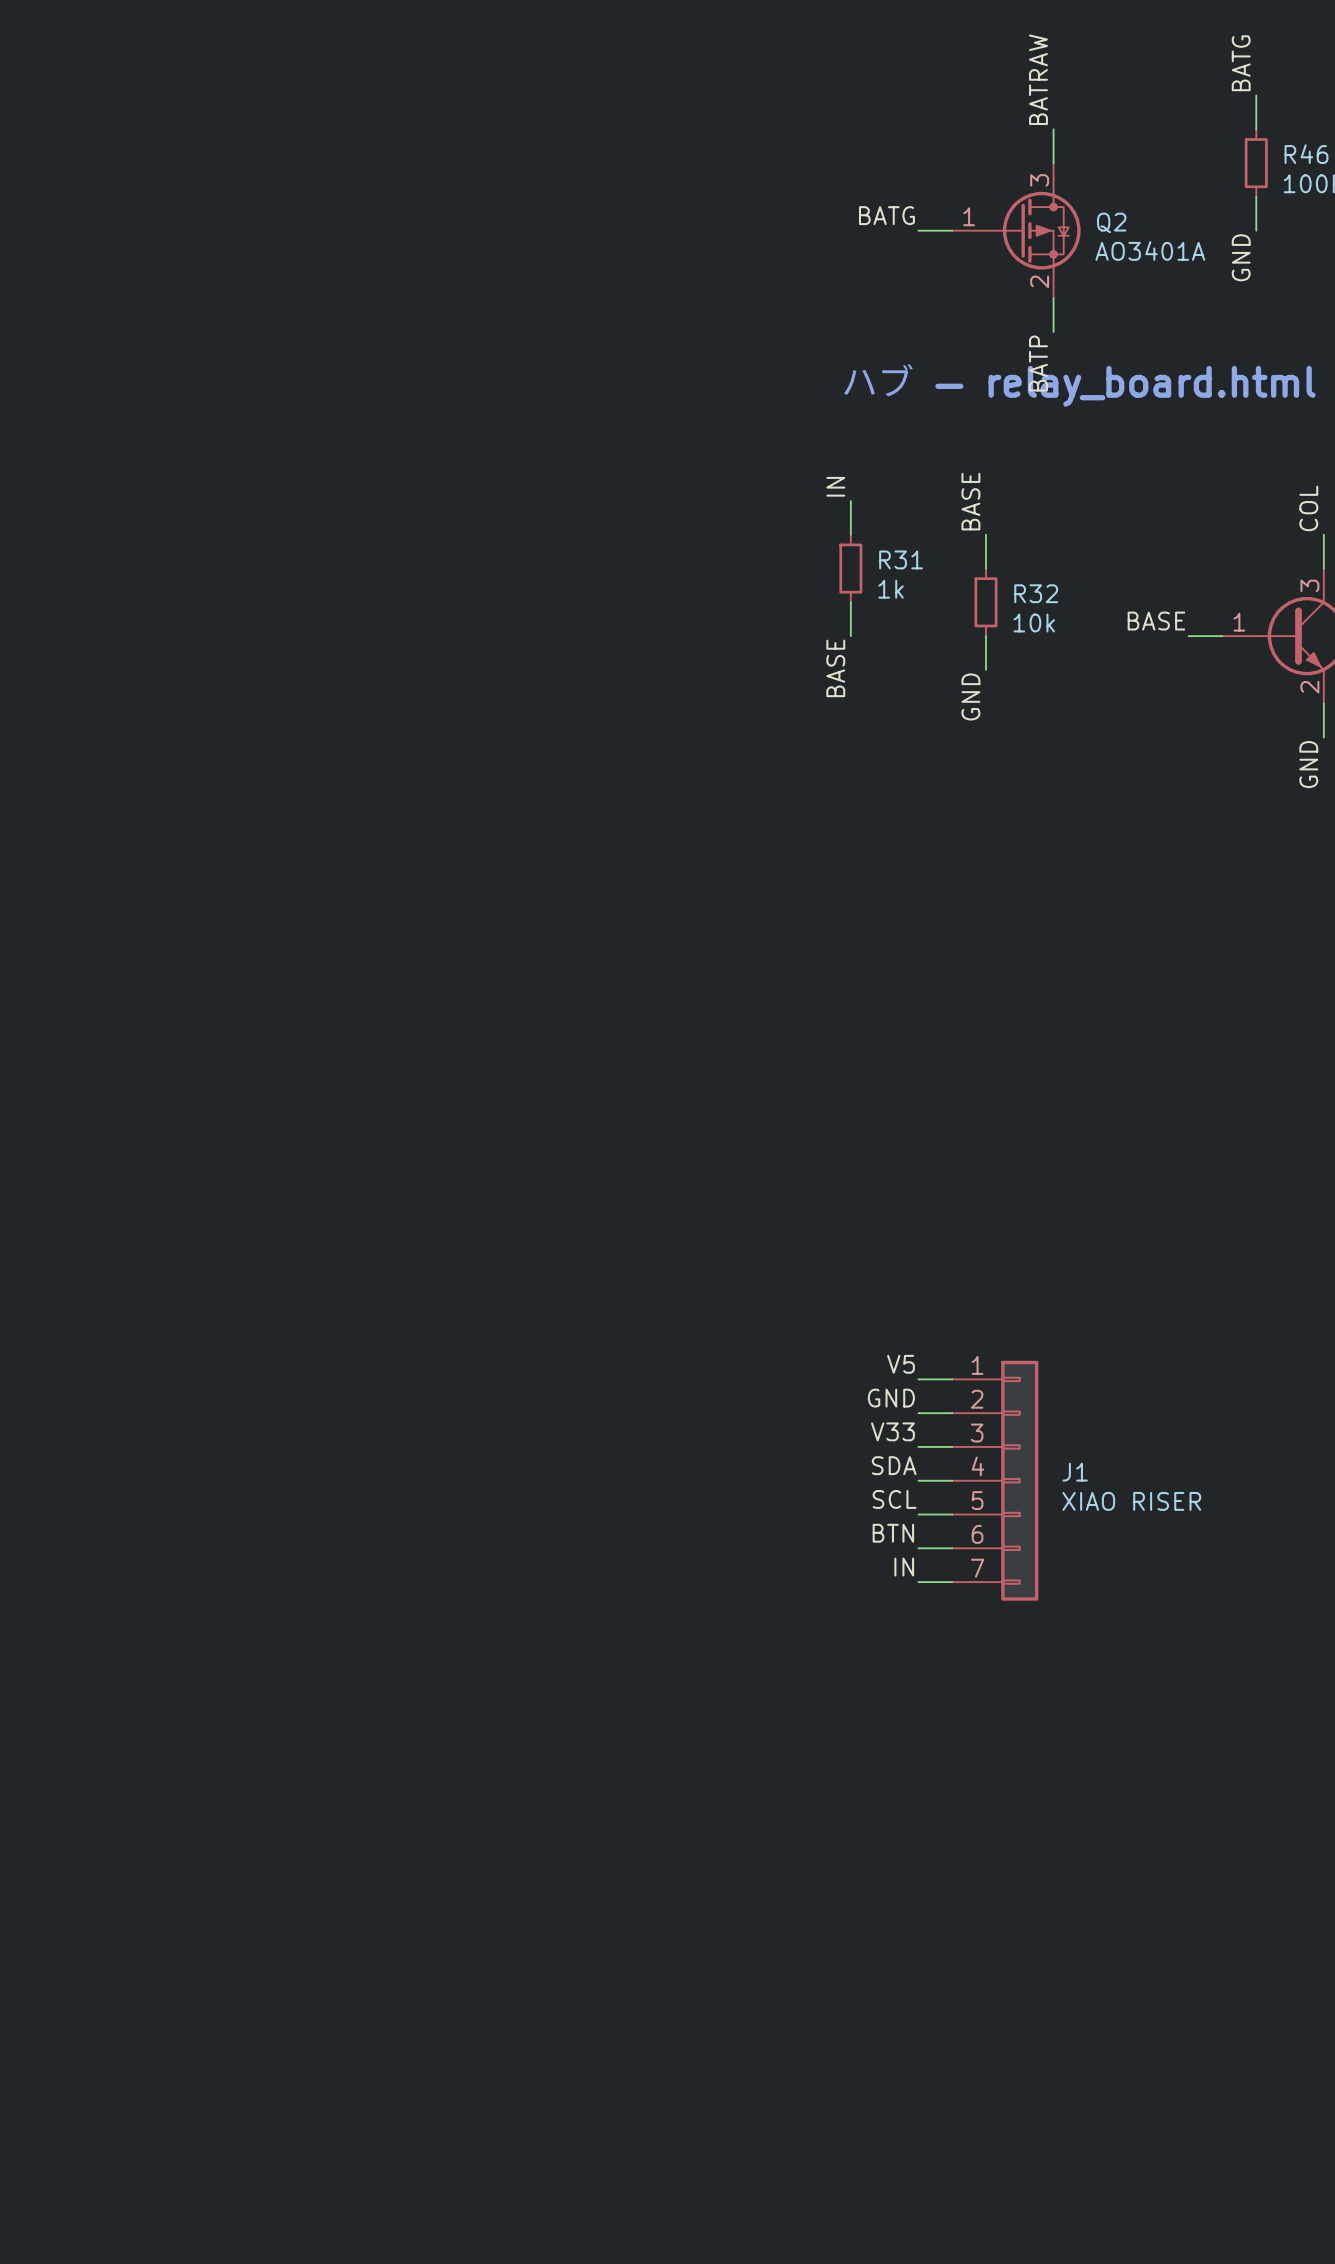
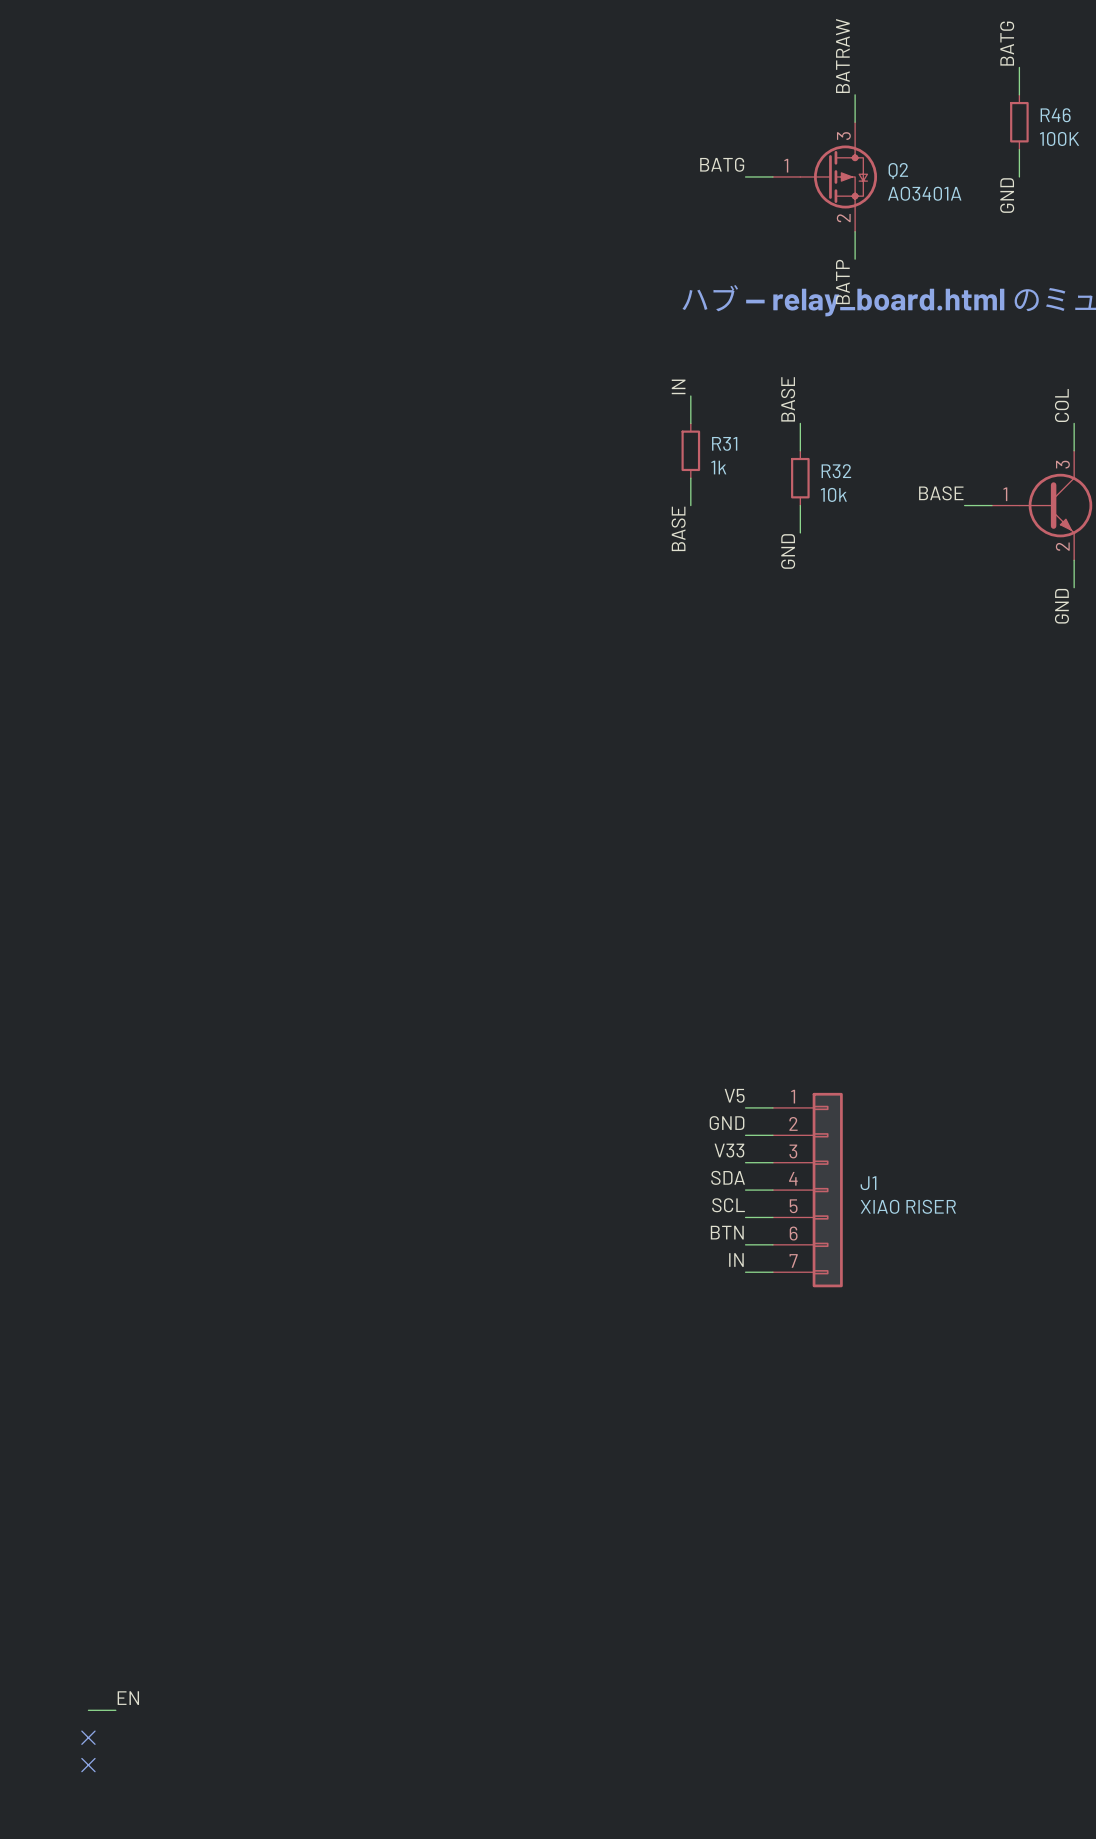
label: none -> EN (128, 1698)
wire: none -> (88, 1710) (115, 1710)
no-connect mark: none -> (88, 1737)
no-connect mark: none -> (88, 1765)

